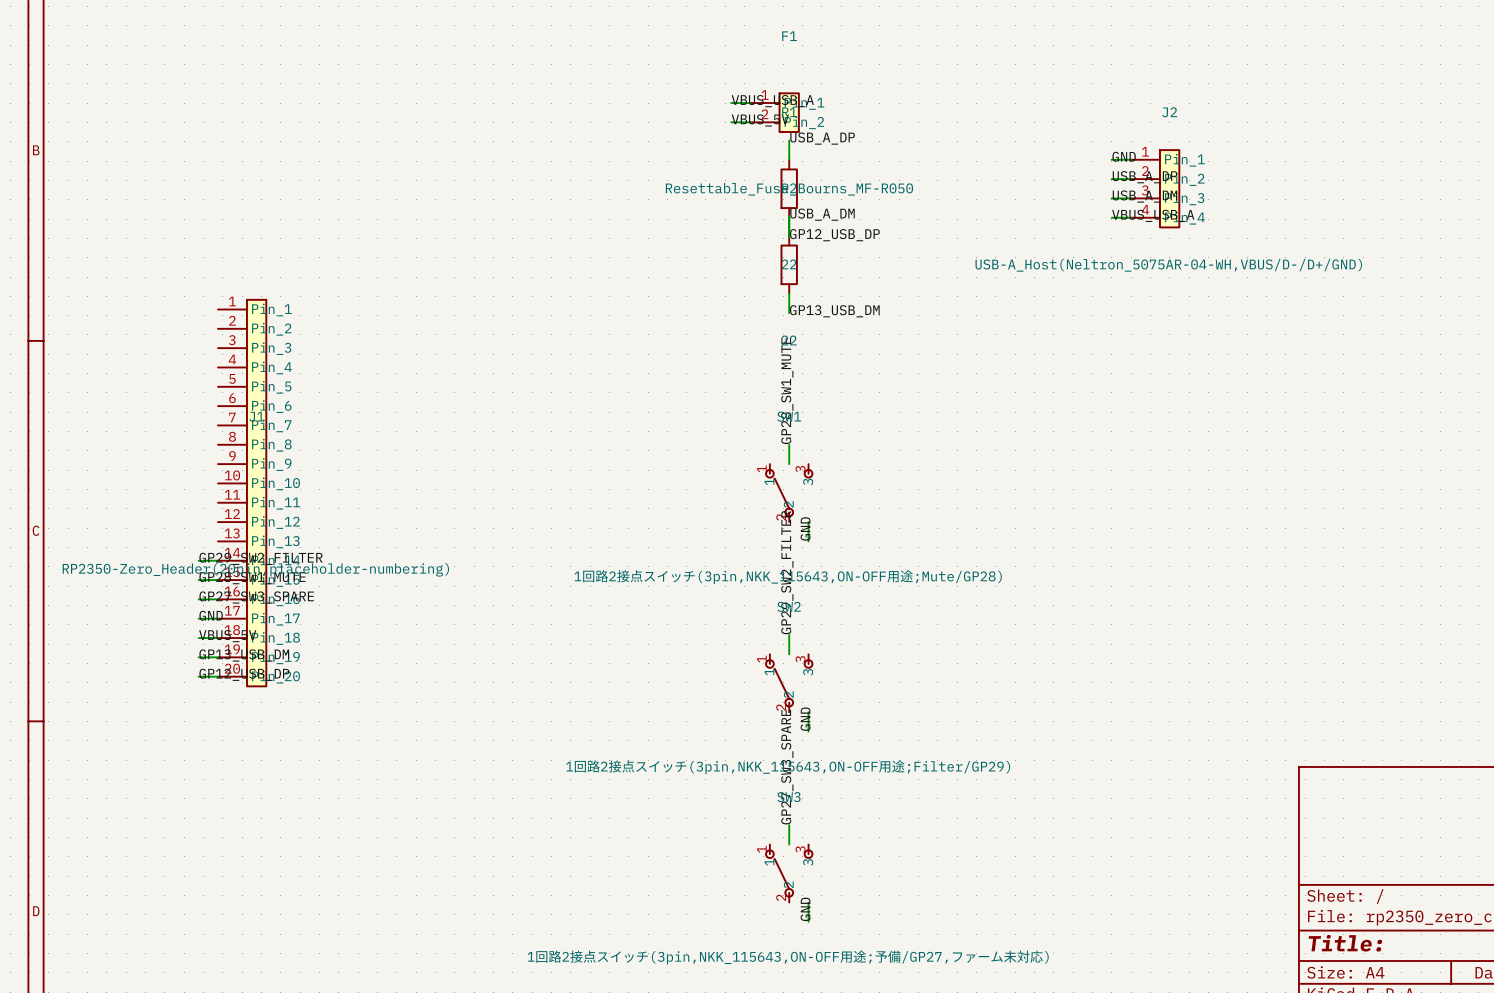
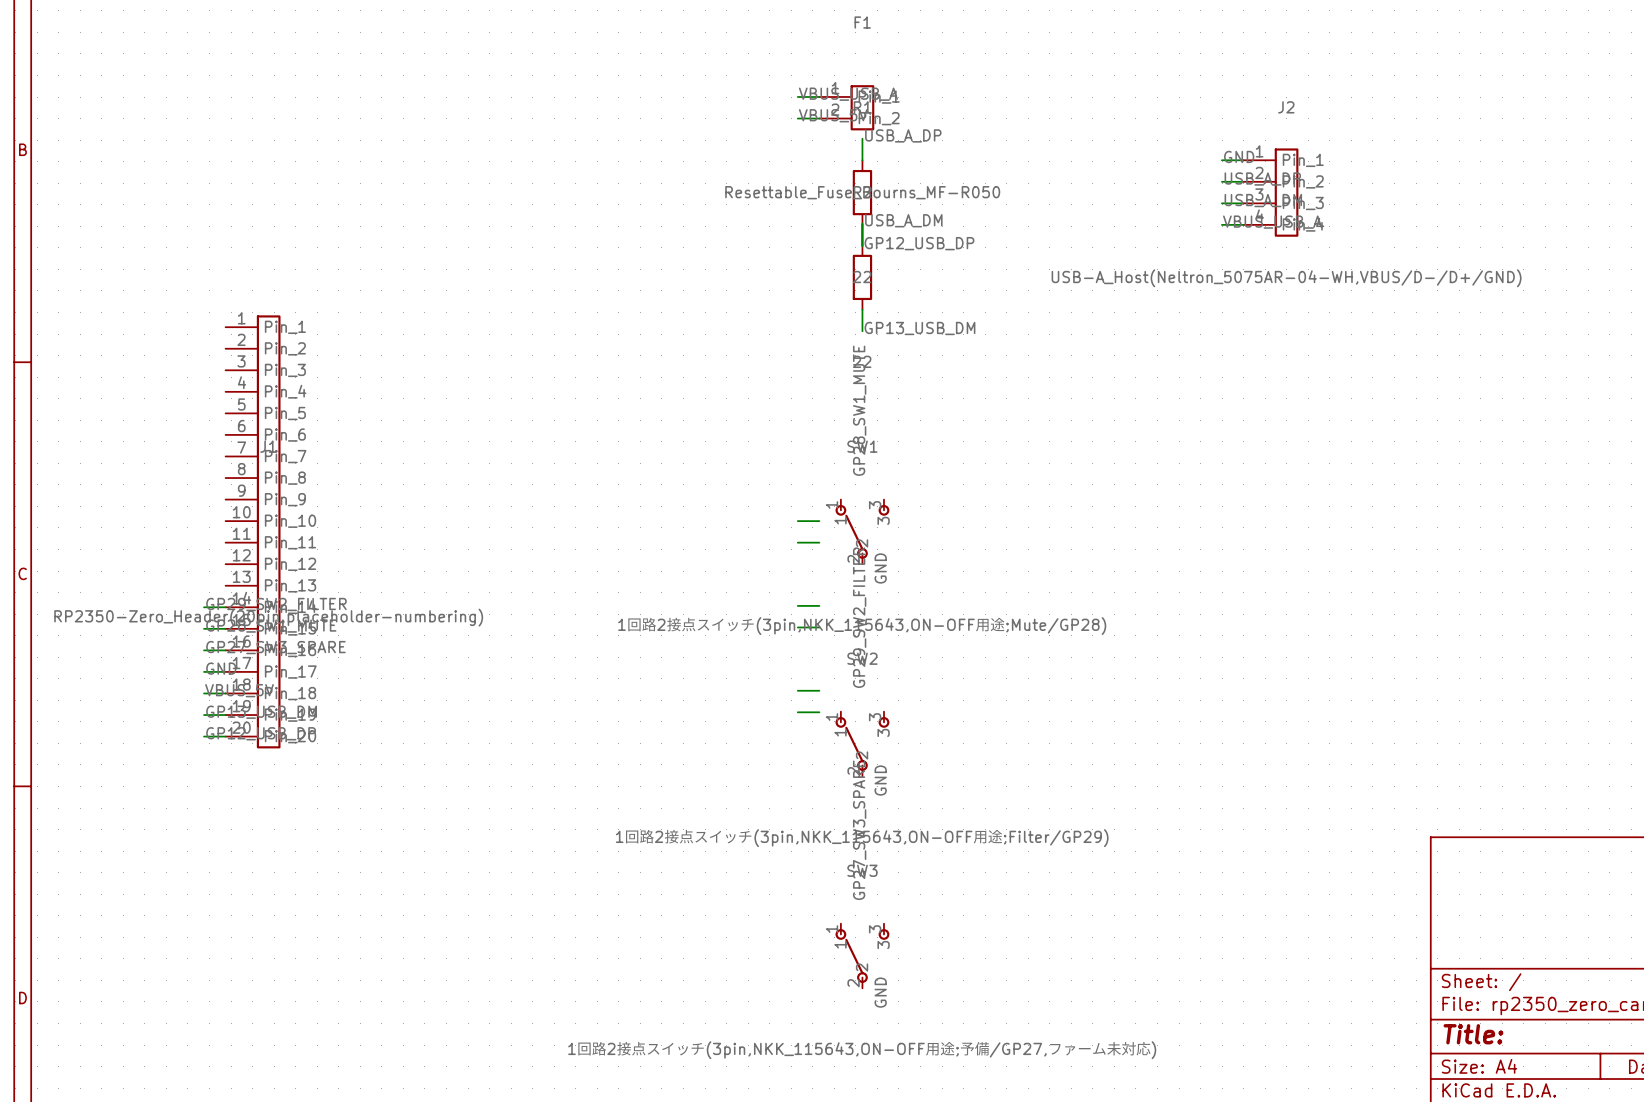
wire: (789, 444) (789, 464) -> none
wire: none -> (797, 521) (819, 521)
wire: none -> (797, 542) (819, 542)
wire: (808, 522) (808, 541) -> none
wire: none -> (797, 605) (819, 605)
wire: none -> (797, 627) (819, 627)
wire: (789, 634) (789, 654) -> none
wire: none -> (797, 690) (819, 690)
wire: none -> (797, 712) (819, 712)
wire: (808, 712) (808, 731) -> none
wire: (789, 825) (789, 844) -> none
wire: (808, 902) (808, 921) -> none

